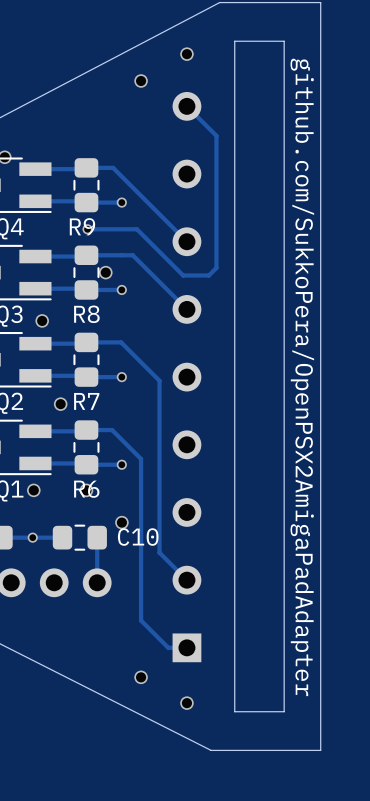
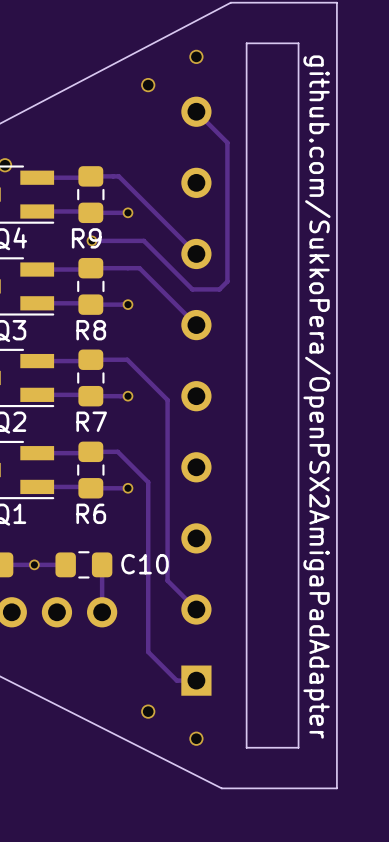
via: (105, 272) -> none
via: (42, 320) -> none
via: (60, 404) -> none
via: (33, 490) -> none
via: (86, 490) -> none
via: (121, 522) -> none

